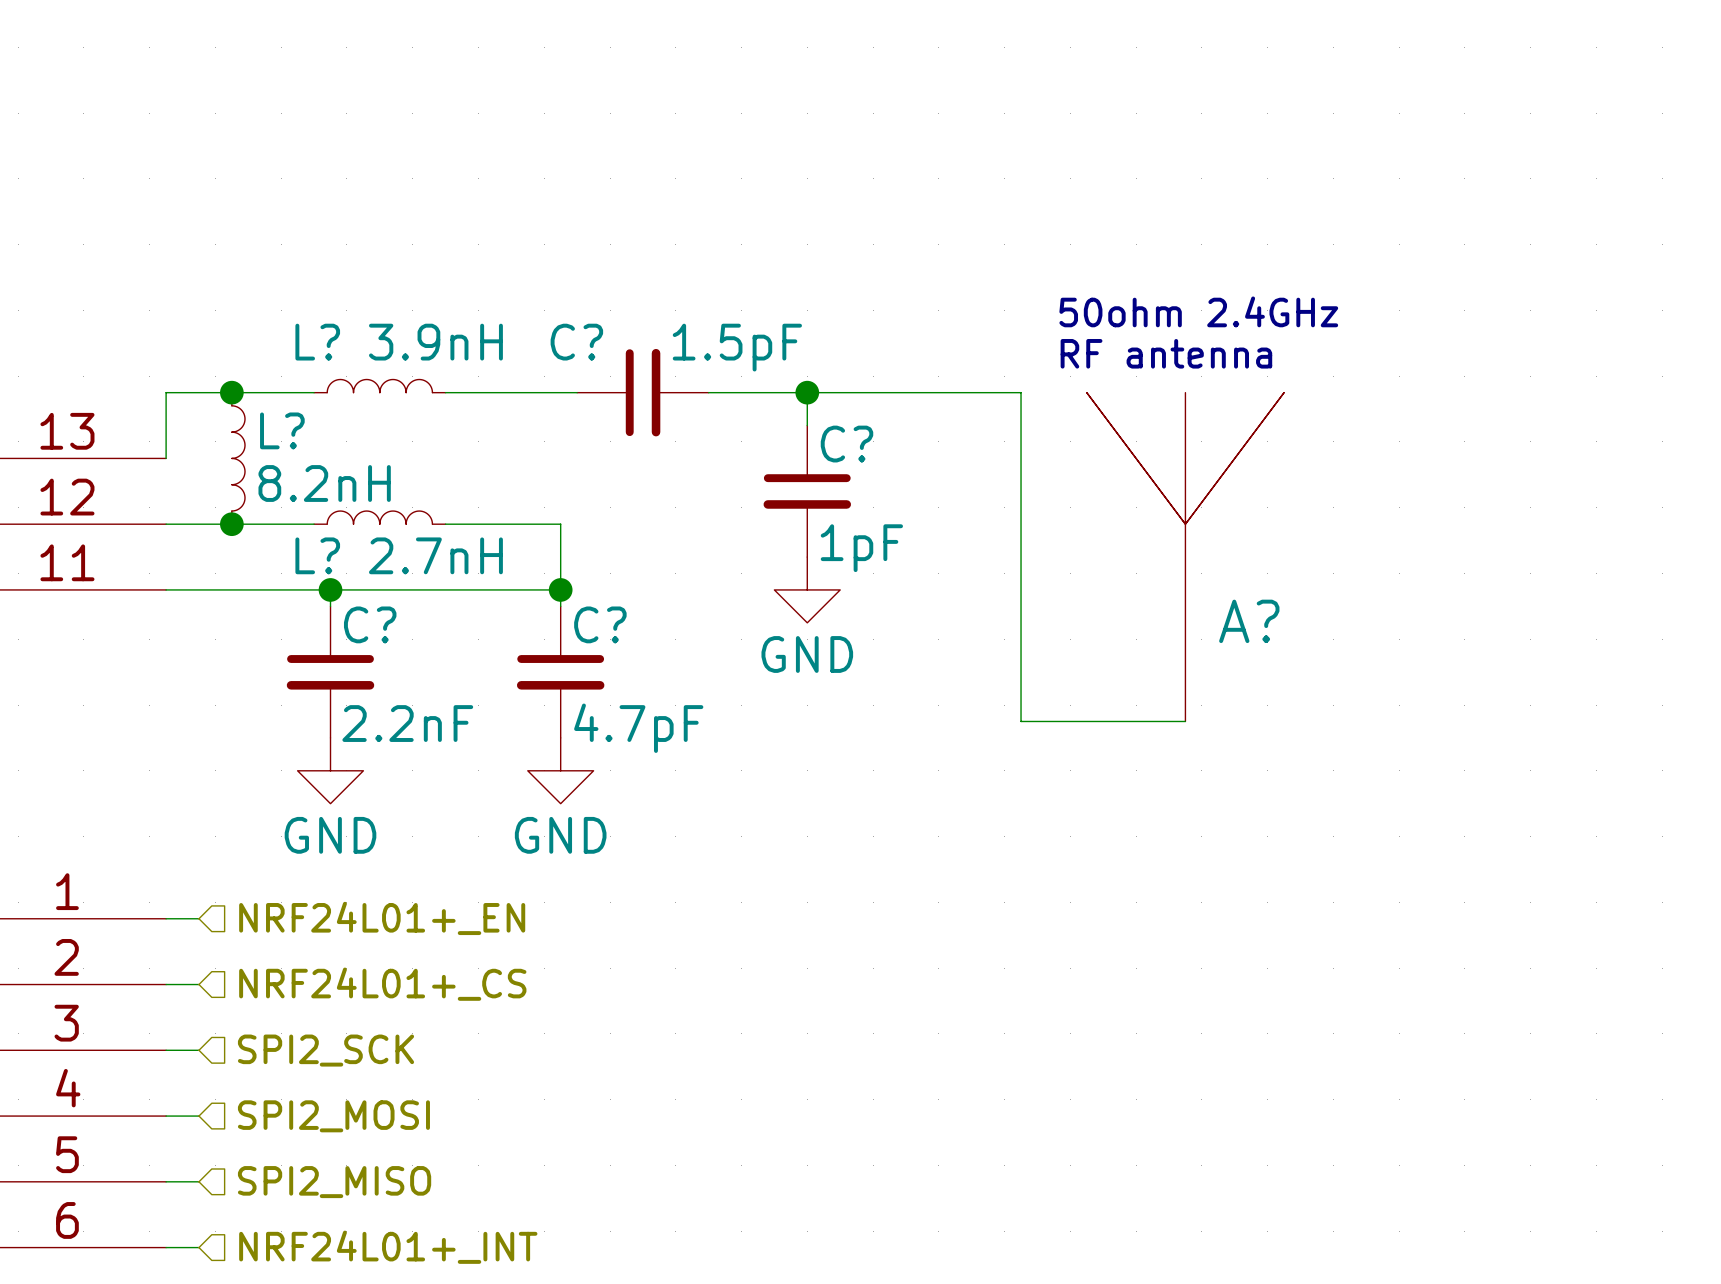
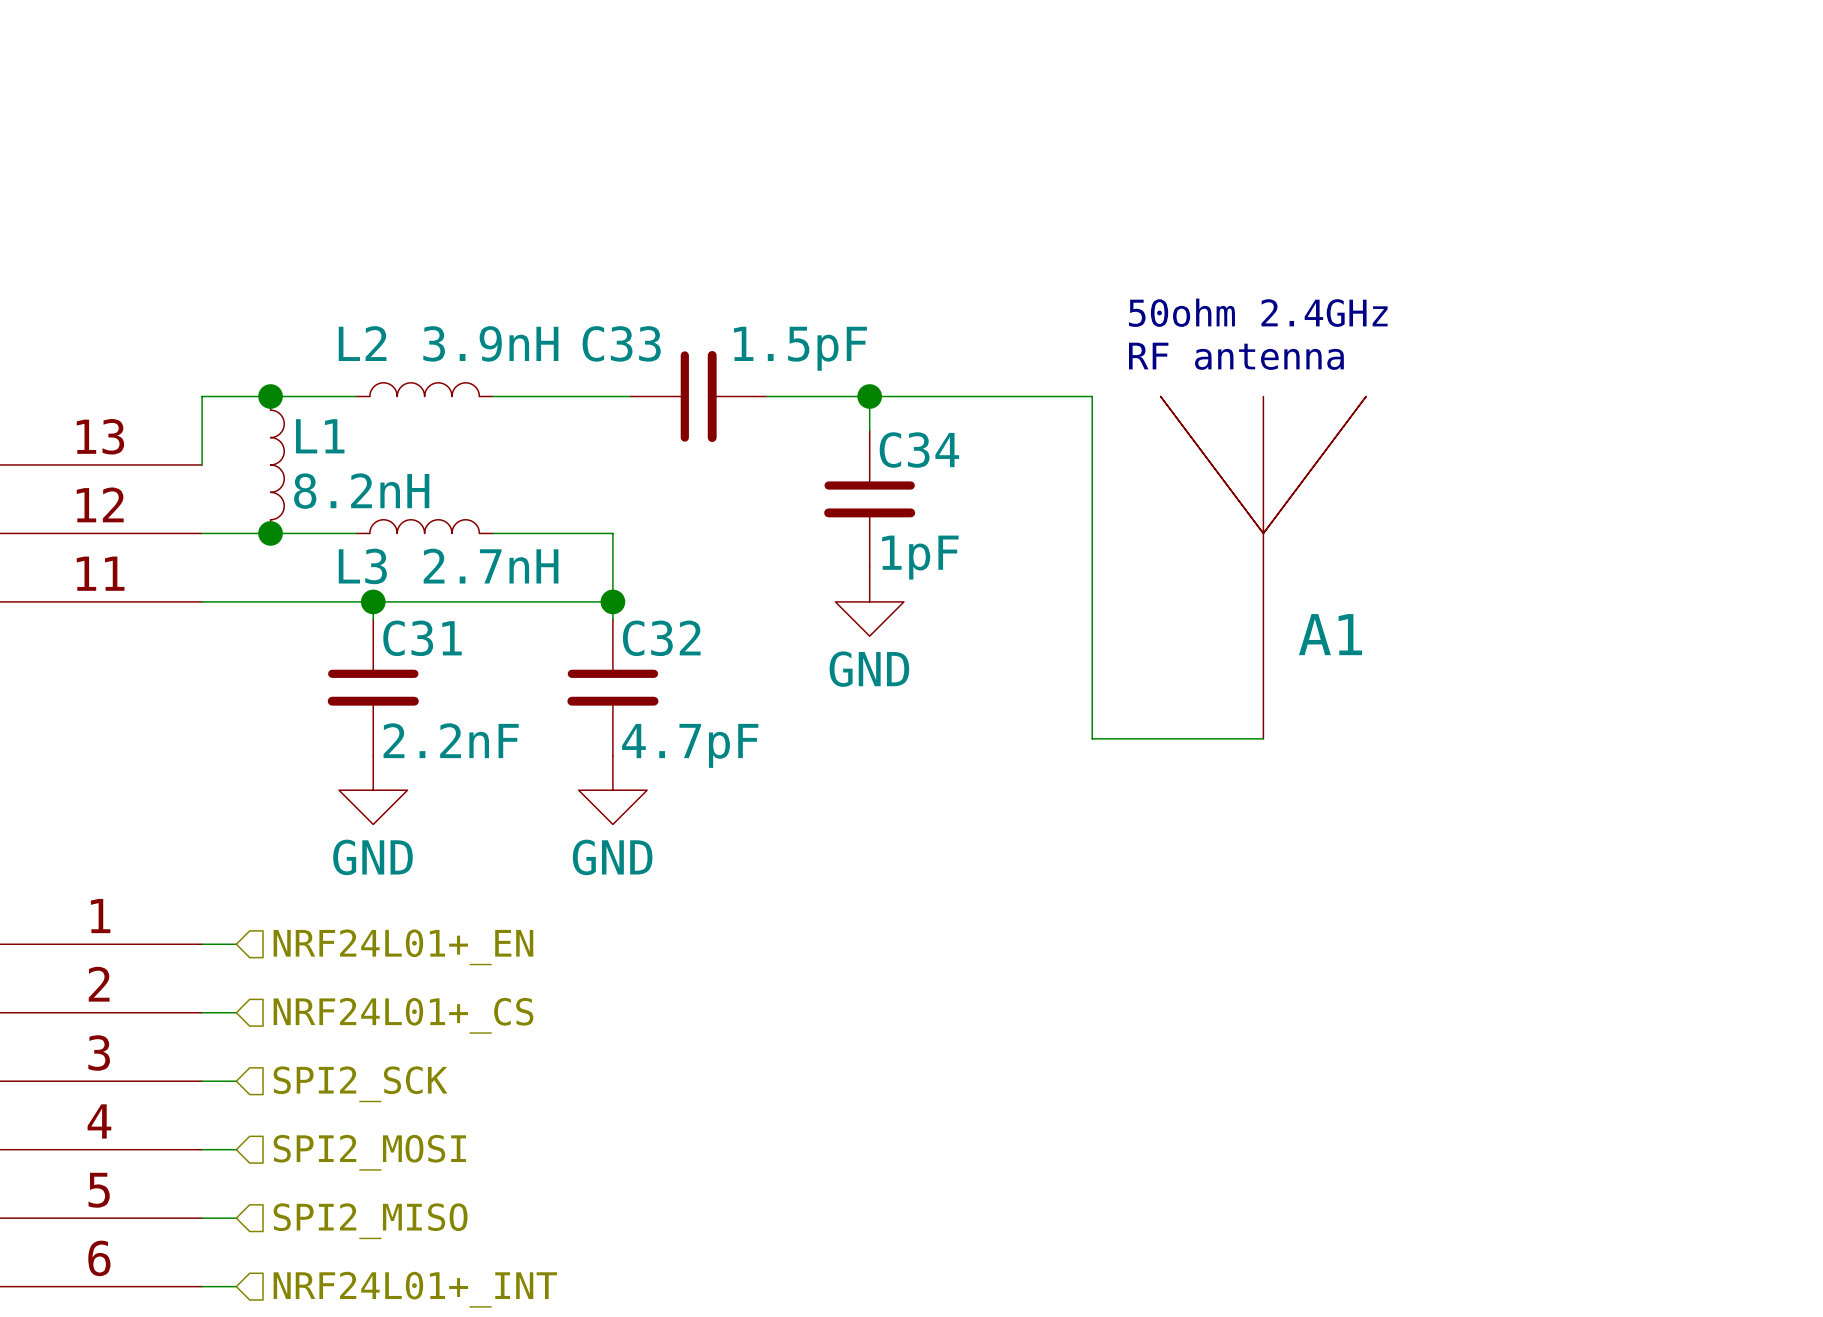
L? name: L? (317, 342) -> L2 (362, 343)
C? name: C? (576, 342) -> C33 (621, 343)
L? name: L? (282, 430) -> L1 (320, 436)
C? name: C? (846, 444) -> C34 (919, 450)
L? name: L? (317, 555) -> L3 (362, 566)
A? name: A? (1249, 621) -> A1 (1330, 634)
C? name: C? (370, 624) -> C31 (422, 638)
C? name: C? (600, 624) -> C32 (661, 638)

